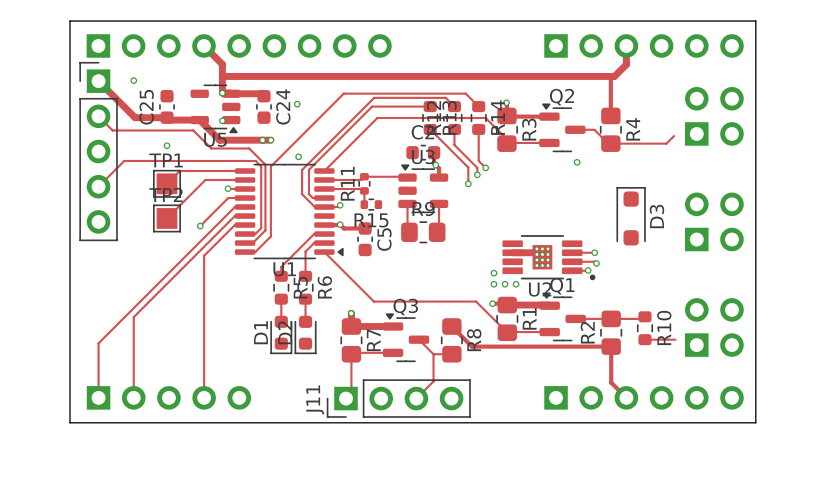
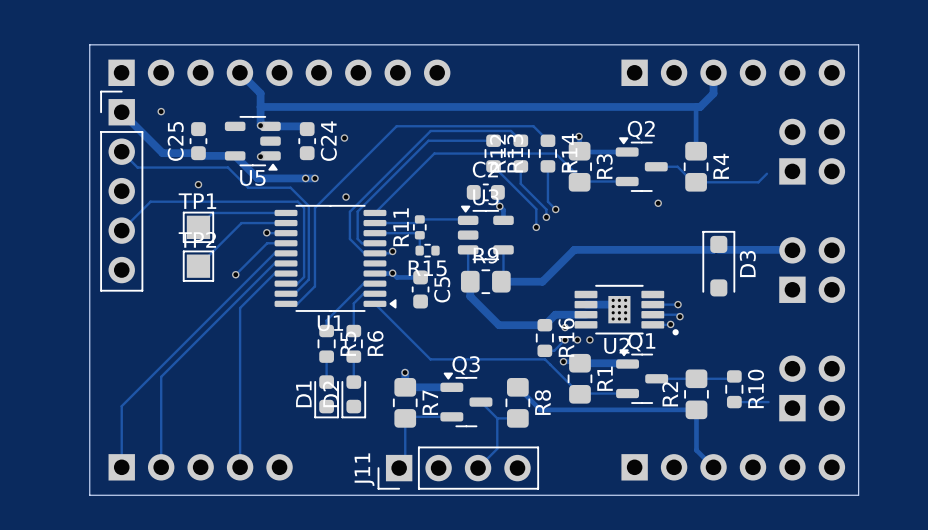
track: none -> (718, 245) (713, 249) (574, 249) (542, 281) (501, 281)
track: none -> (718, 249) (791, 249)
track: none -> (470, 281) (470, 296) (499, 325) (544, 325) (555, 314) (586, 314)
R16: none -> (544, 338)
track: none -> (565, 339) (554, 350) (544, 350)

